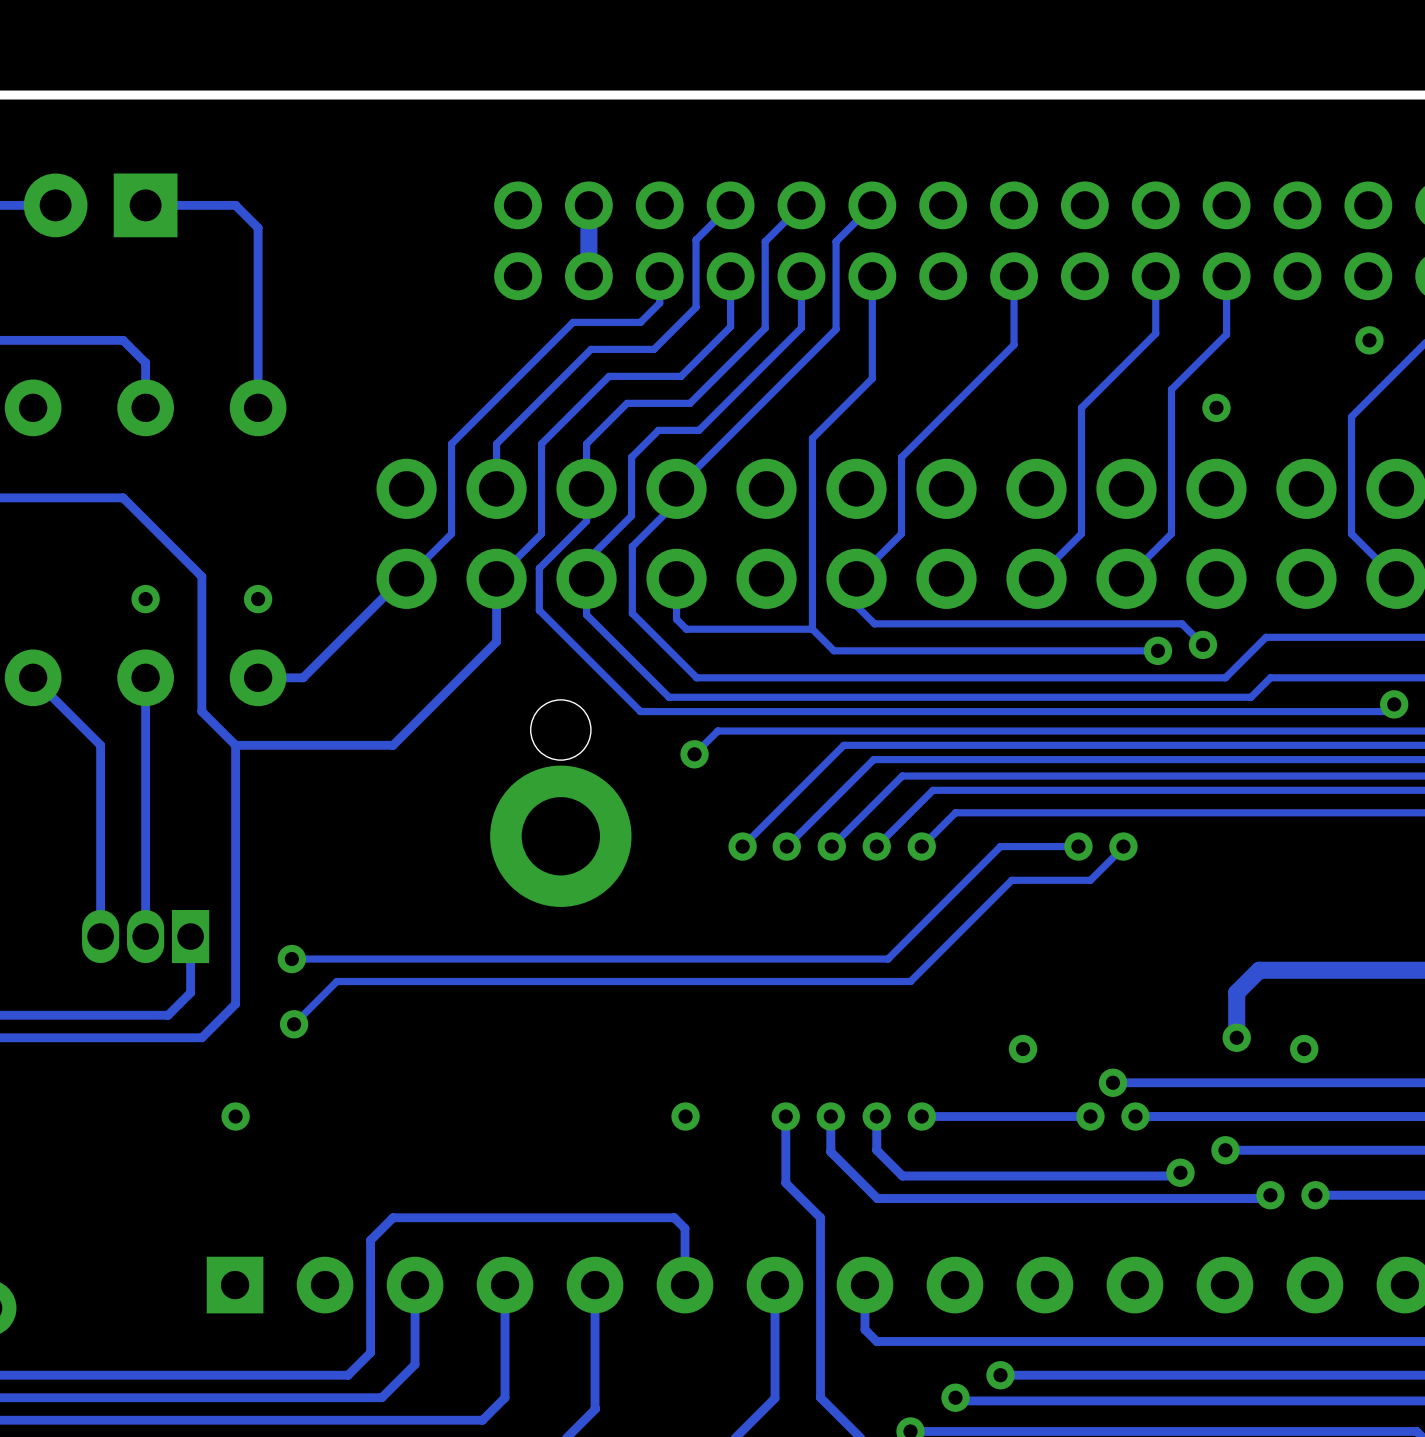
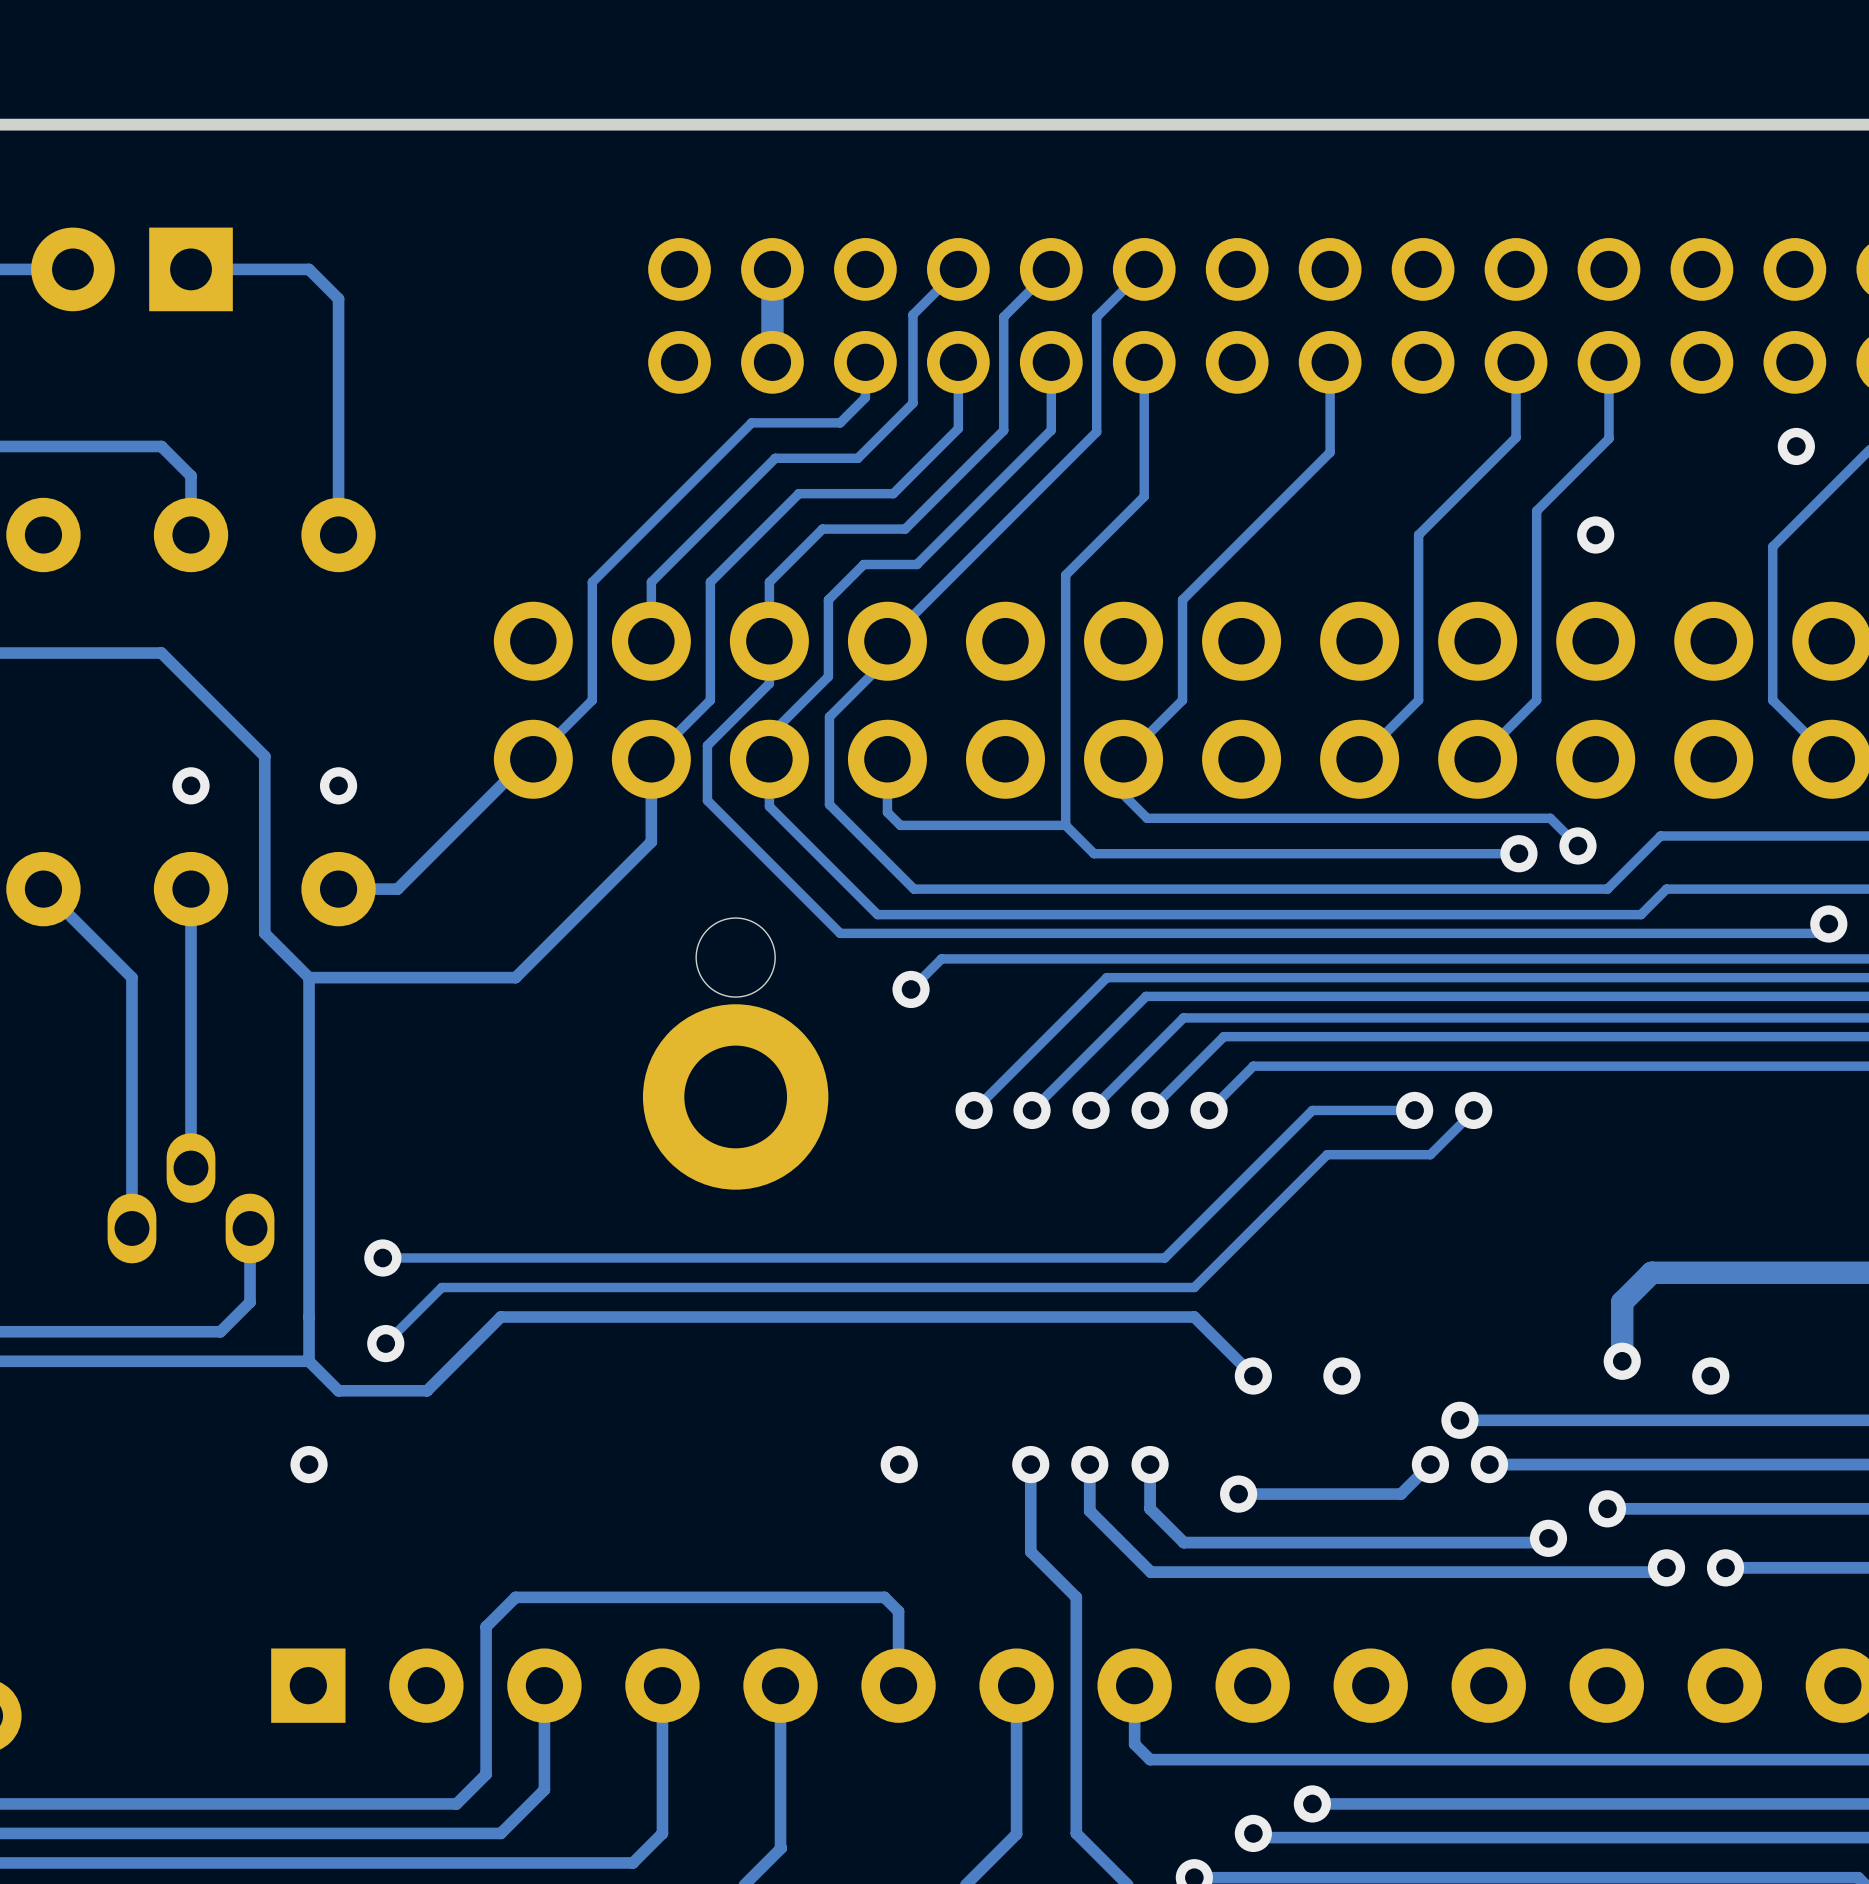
track: (145, 883) (145, 936) -> none
part footprint: [82, 909, 210, 964] -> [107, 1133, 275, 1264]
track: (235, 1004) (201, 1037) -> (309, 1361) (264, 1361)
track: none -> (309, 1317) (309, 1361)
track: none -> (309, 1361) (338, 1390) (427, 1390) (500, 1317) (1194, 1317) (1253, 1376)
via: none -> (1253, 1376)
via position: (921, 1116) -> (1238, 1494)
track: (1090, 1116) (921, 1116) -> (1430, 1464) (1400, 1494) (1238, 1494)

